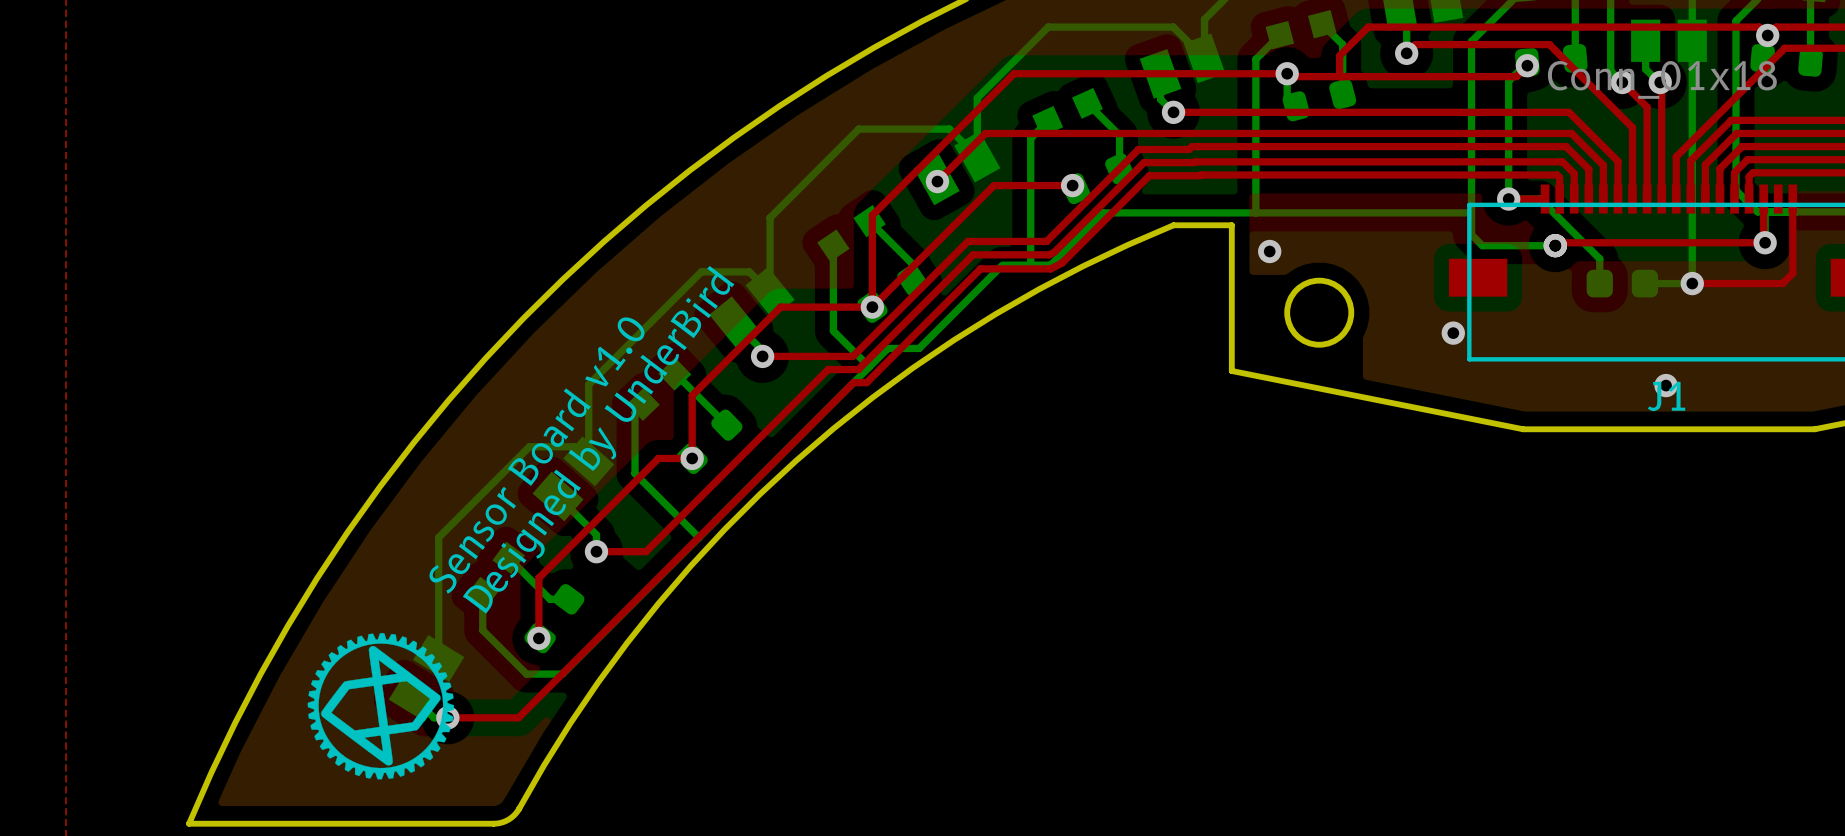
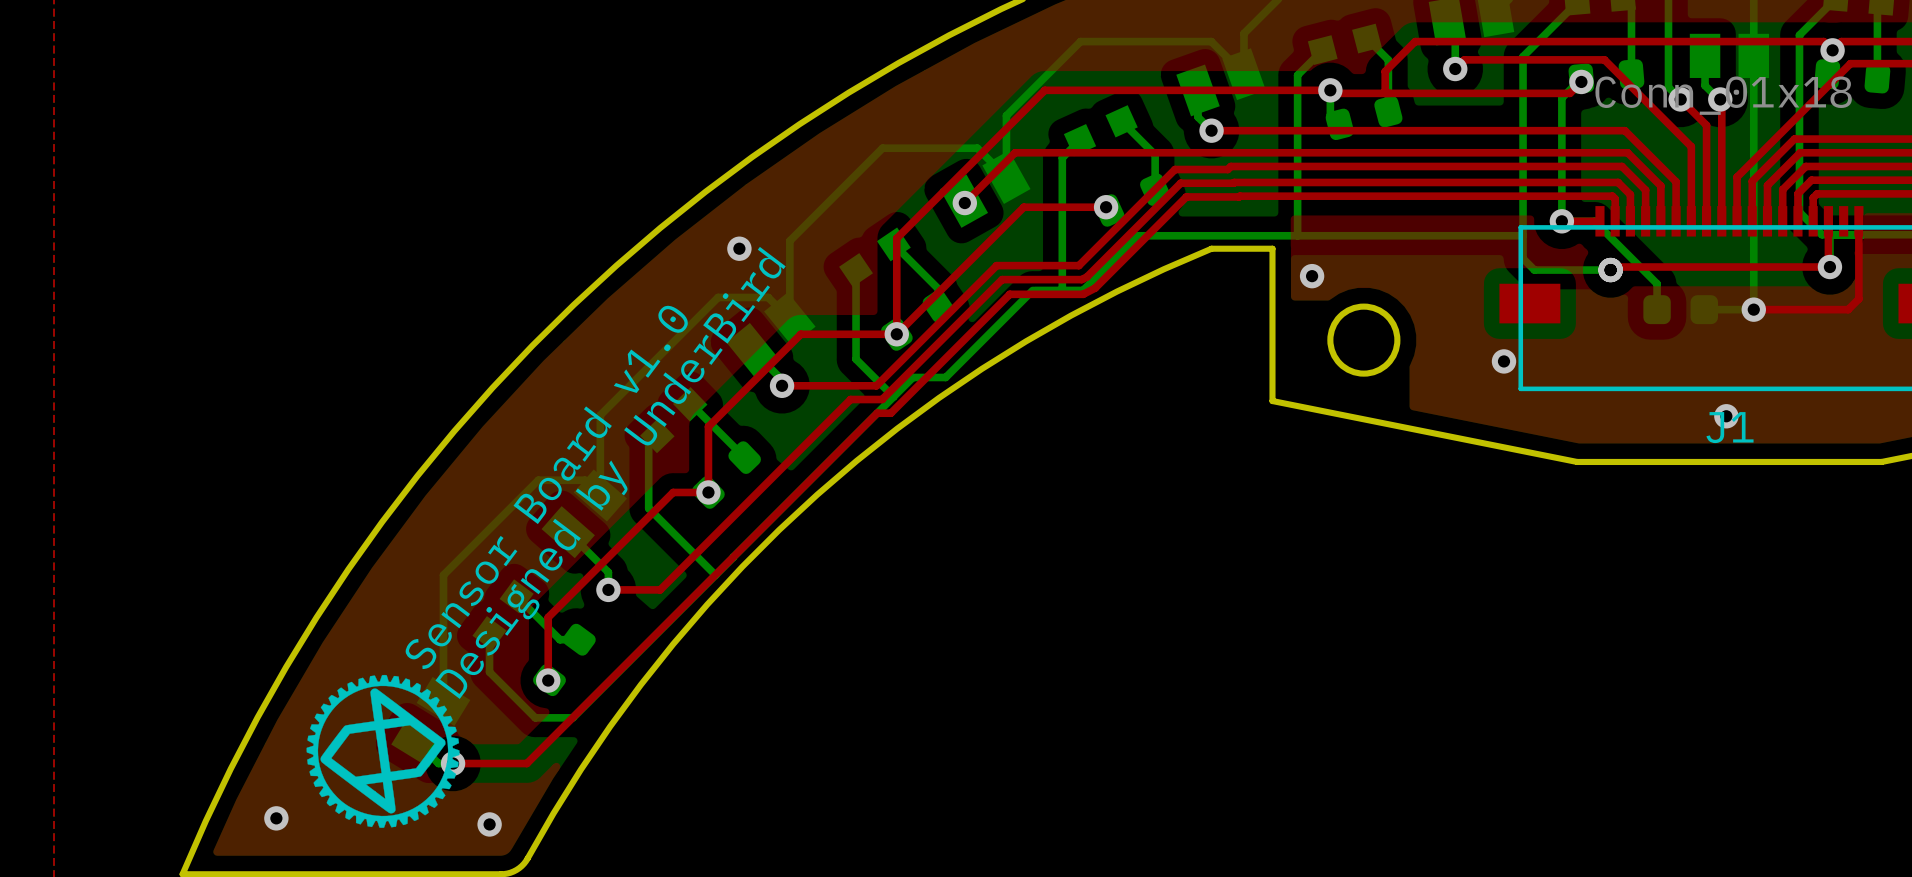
via: none -> (739, 248)
via: none -> (276, 818)
via: none -> (489, 824)

